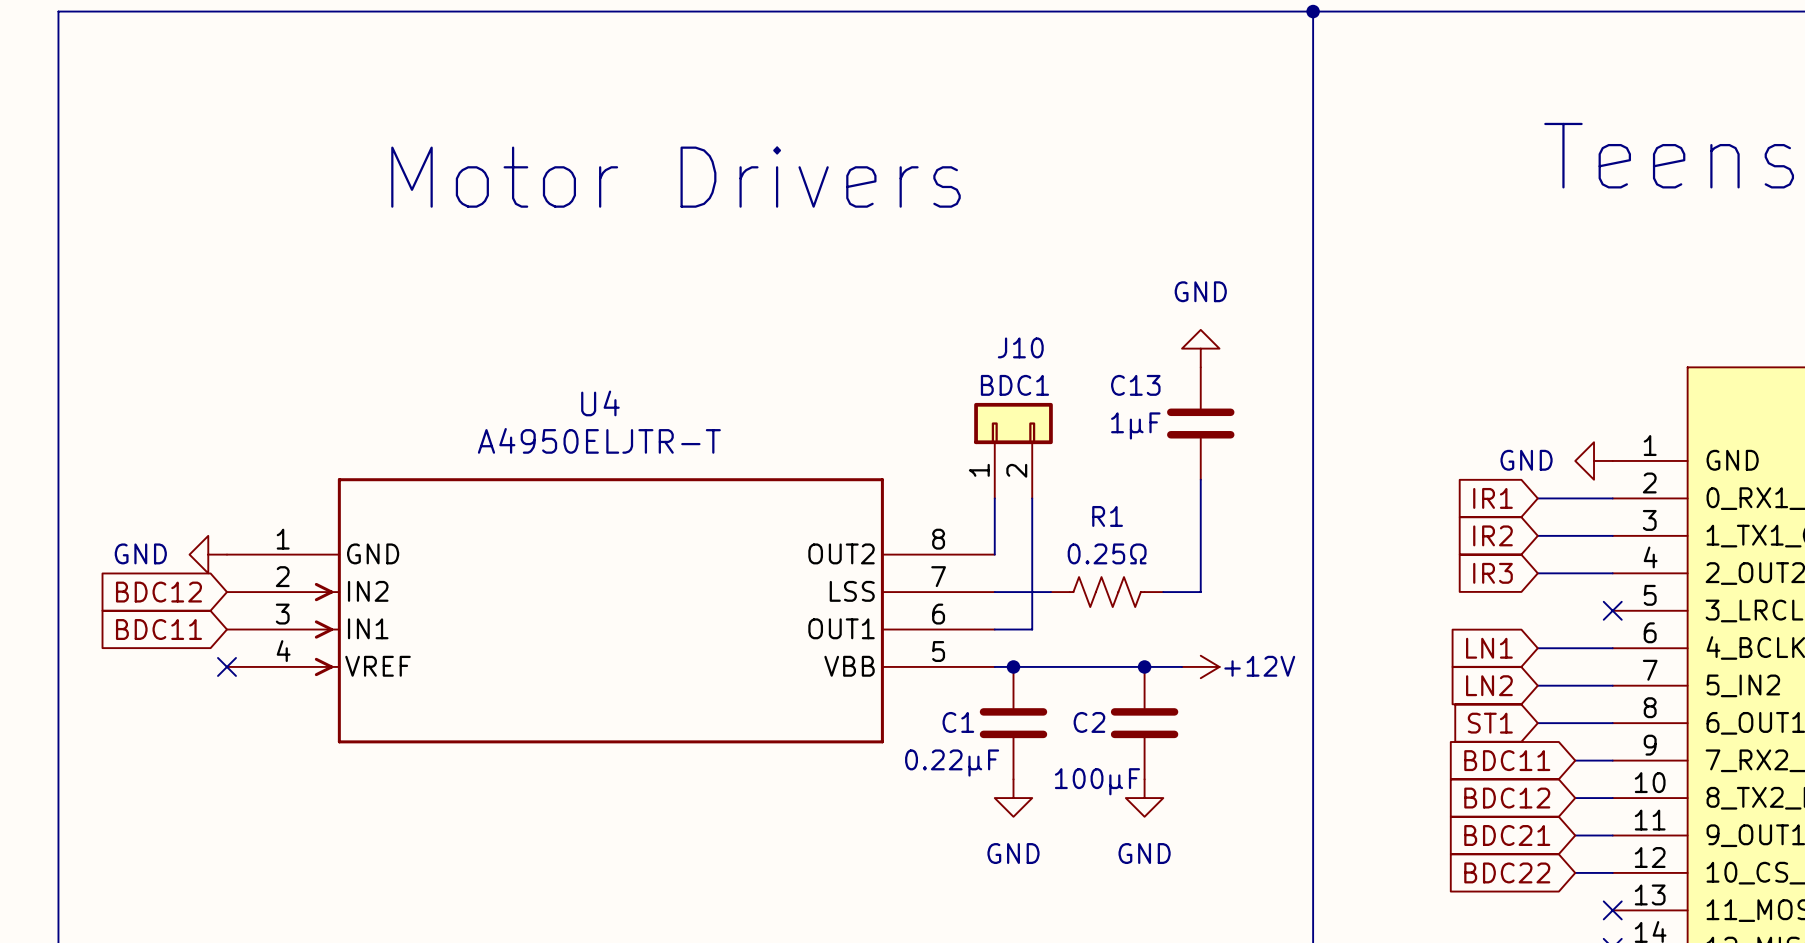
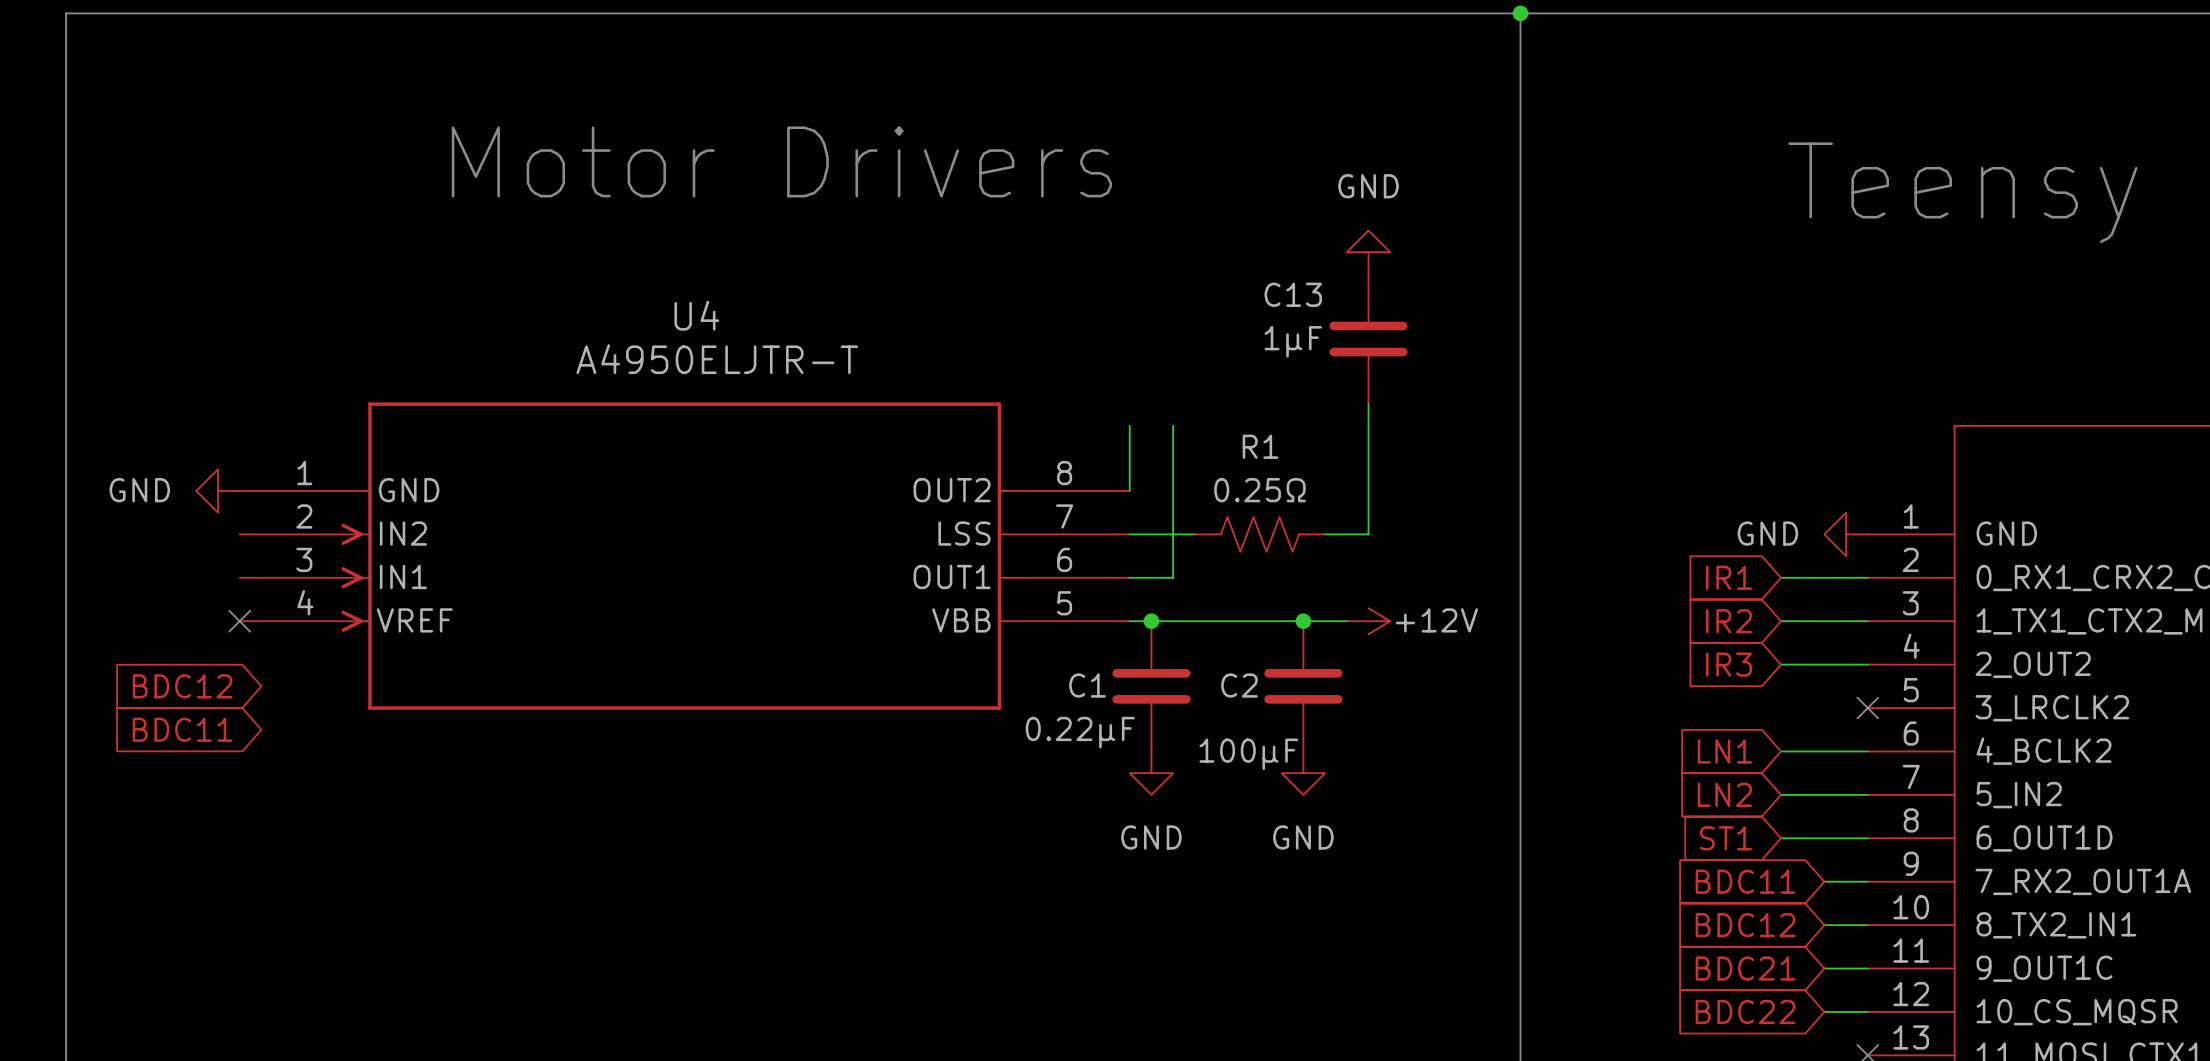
text position: Motor Drivers (675, 177) -> Motor Drivers (781, 161)
power symbol position: GND (1200, 348) -> GND (1368, 252)
U4 name position: U4 (600, 403) -> U4 (696, 315)
C13 position: (1200, 423) -> (1368, 339)
U4 value position: A4950ELJTR-T (599, 440) -> A4950ELJTR-T (717, 359)
J10: BDC1 (1013, 450) -> none
wire: (1200, 479) (1200, 592) (1163, 592) -> (1368, 404) (1368, 534) (1325, 534)
wire: (994, 498) (994, 554) -> (1129, 425) (1129, 490)
wire: (1032, 498) (1032, 629) (994, 629) -> (1173, 425) (1173, 577) (1129, 577)
no-connect mark: none -> (239, 621)
junction: none -> (1151, 621)
junction: none -> (1303, 621)
power symbol position: GND (208, 554) -> GND (218, 490)
wire: (994, 592) (1050, 592) -> (1129, 534) (1194, 534)
R1 position: (1107, 592) -> (1259, 534)
U4 position: (610, 610) -> (684, 556)
no-connect mark: (227, 666) -> none
wire: (994, 666) (1182, 666) -> (1129, 621) (1346, 621)
power symbol: none -> GND (1151, 773)
junction: (1013, 666) -> none
power symbol: none -> GND (1303, 773)
junction: (1144, 666) -> none
power symbol position: +12V (1200, 666) -> +12V (1368, 621)
C1 position: (1013, 723) -> (1151, 686)
C2 position: (1144, 723) -> (1303, 686)
power symbol: GND (1013, 798) -> none
power symbol: GND (1144, 798) -> none

